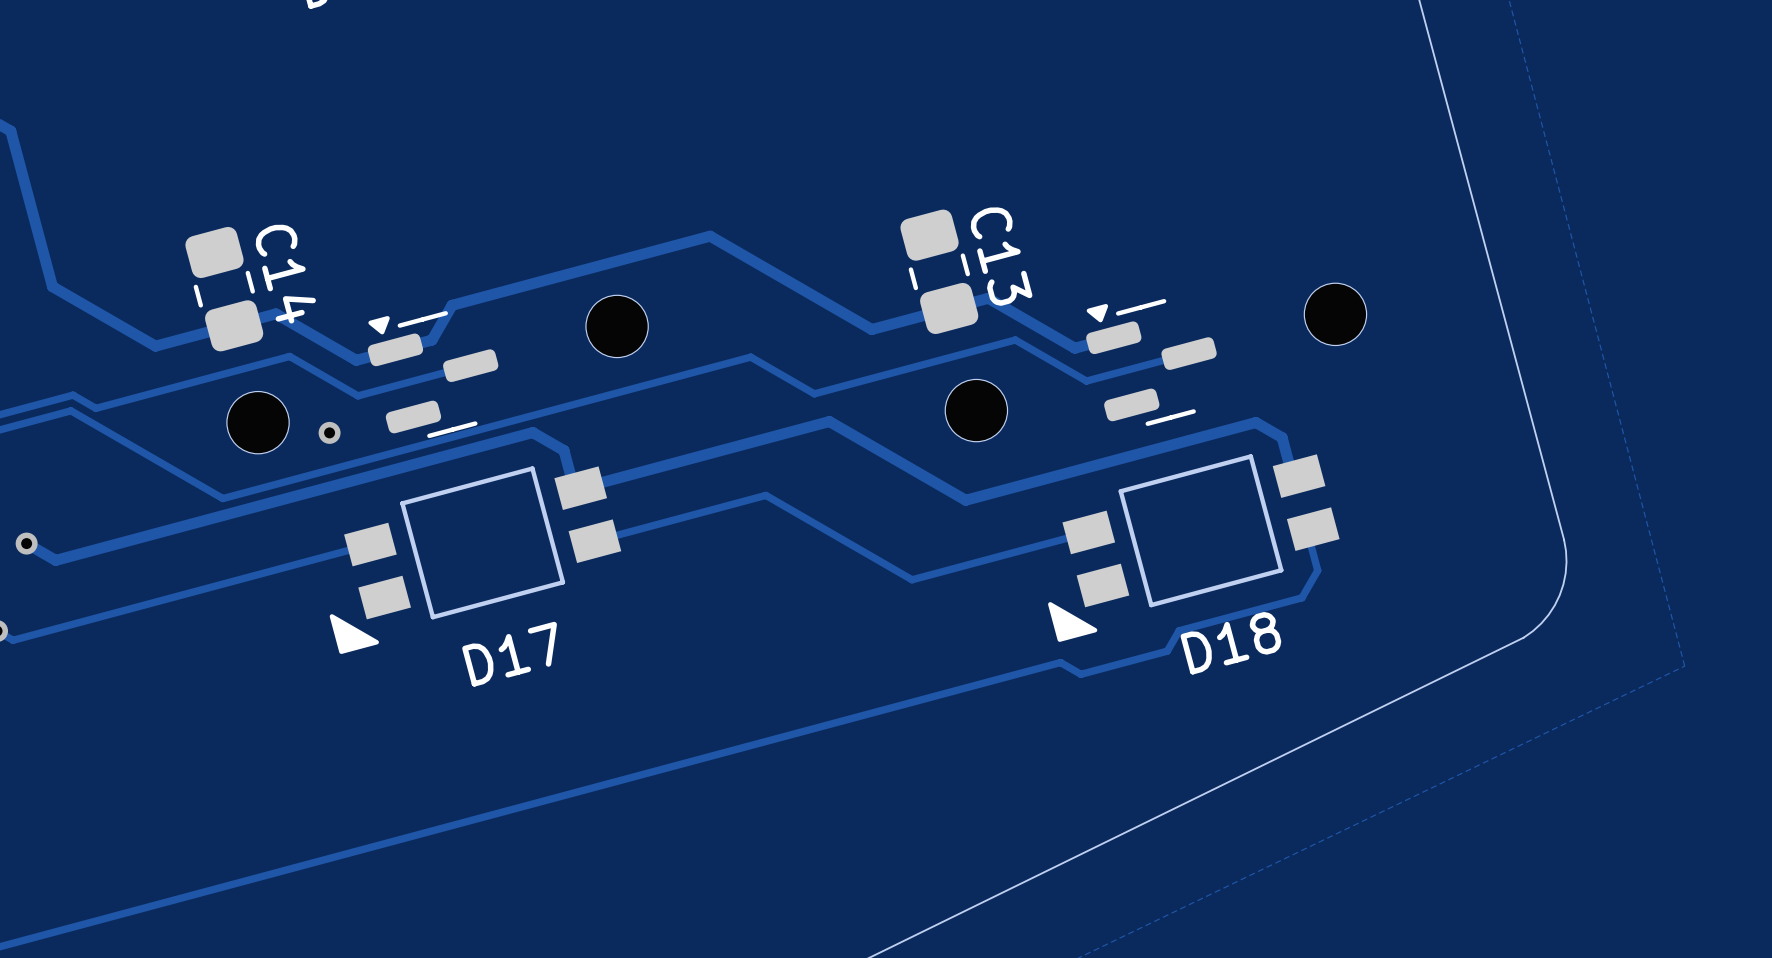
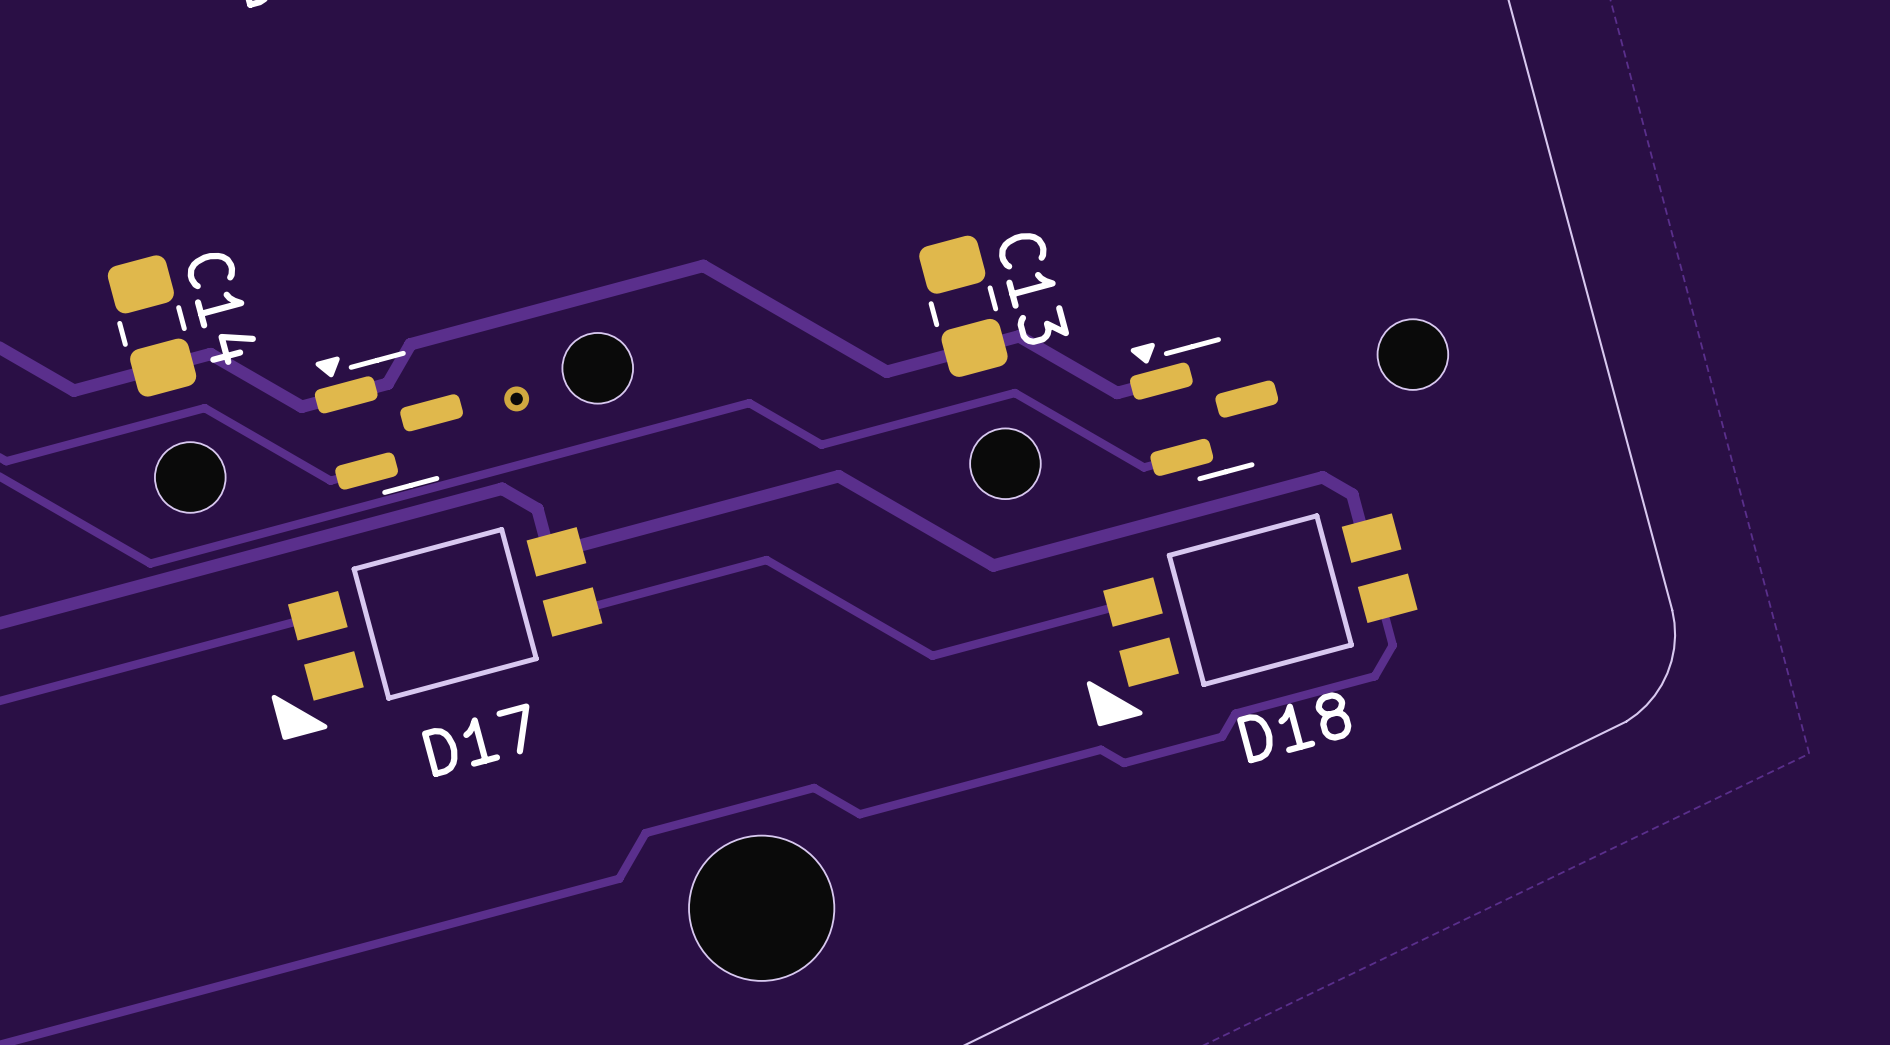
track: (984, 348) (1015, 339) (1086, 381) (1189, 353) -> (1014, 392) (1143, 467) (1181, 457)
via: none -> (516, 398)
track: (270, 361) (289, 356) (358, 395) (470, 365) -> (204, 408) (330, 480) (366, 471)
via: (329, 432) -> none
track: (848, 719) (636, 776) -> (859, 814) (814, 787) (645, 833) (619, 878)
part: none -> (761, 908)

